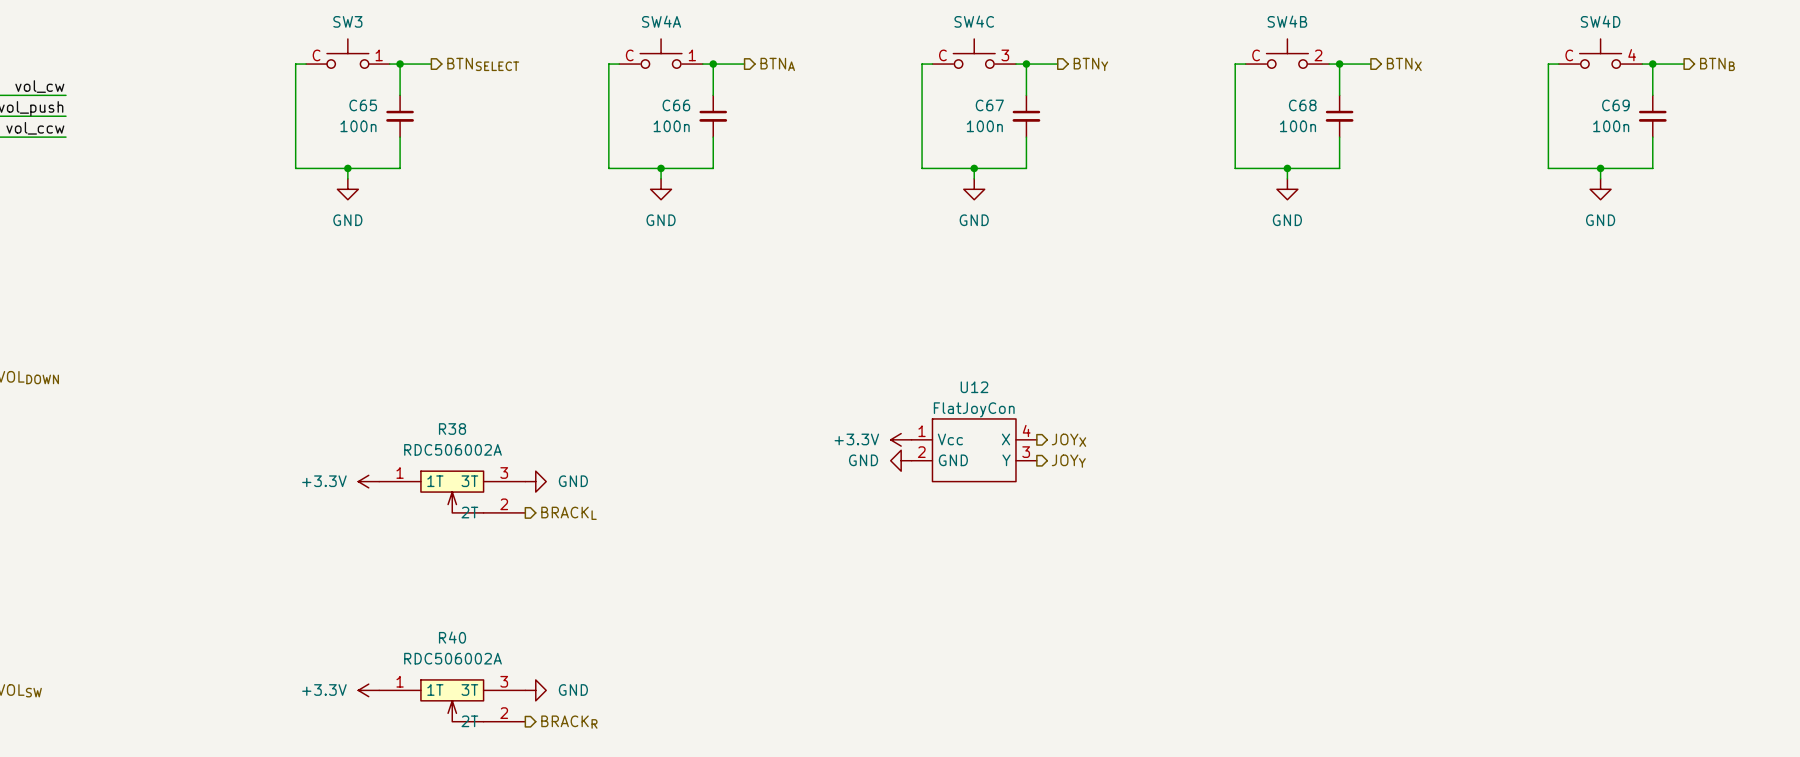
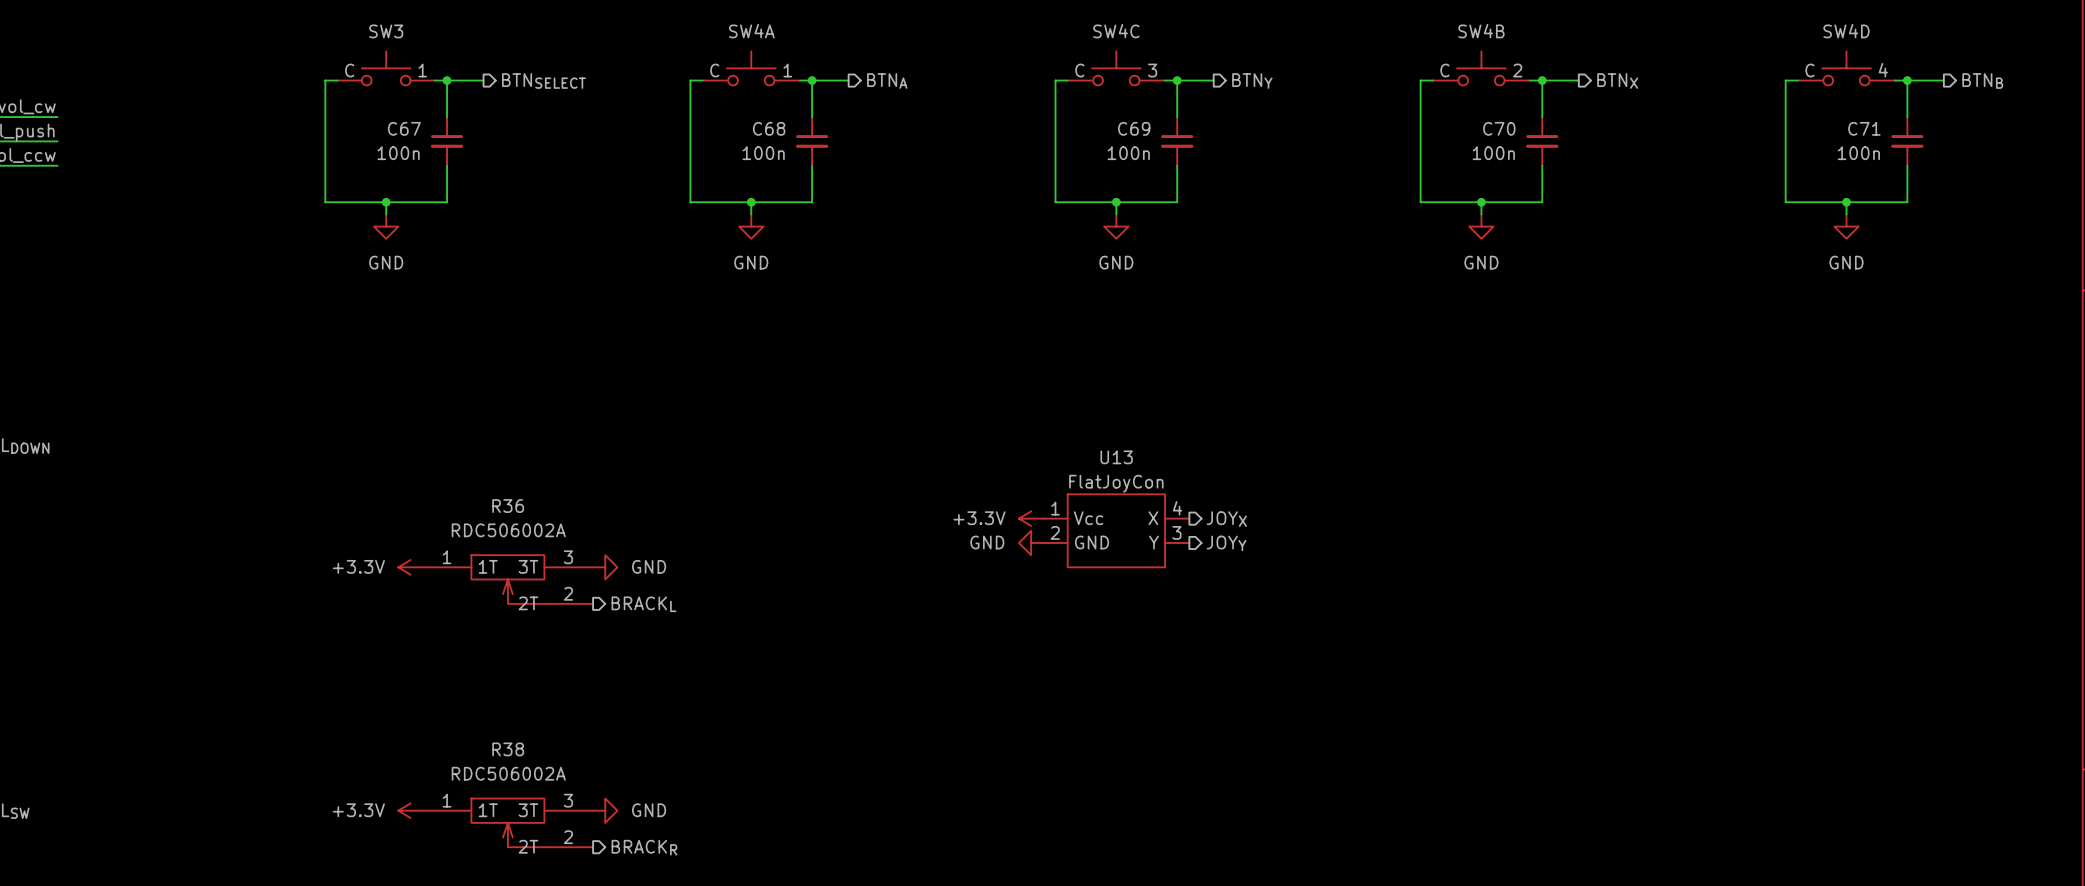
C65 name: C65 (363, 105) -> C67 (404, 128)
C66 name: C66 (676, 105) -> C68 (769, 128)
C67 name: C67 (989, 105) -> C69 (1134, 128)
C68 name: C68 (1302, 105) -> C70 (1499, 128)
C69 name: C69 (1615, 105) -> C71 (1864, 128)
U12 name: U12 (974, 387) -> U13 (1116, 457)
R38 name: R38 (452, 429) -> R36 (508, 506)
R40 name: R40 (452, 637) -> R38 (508, 749)

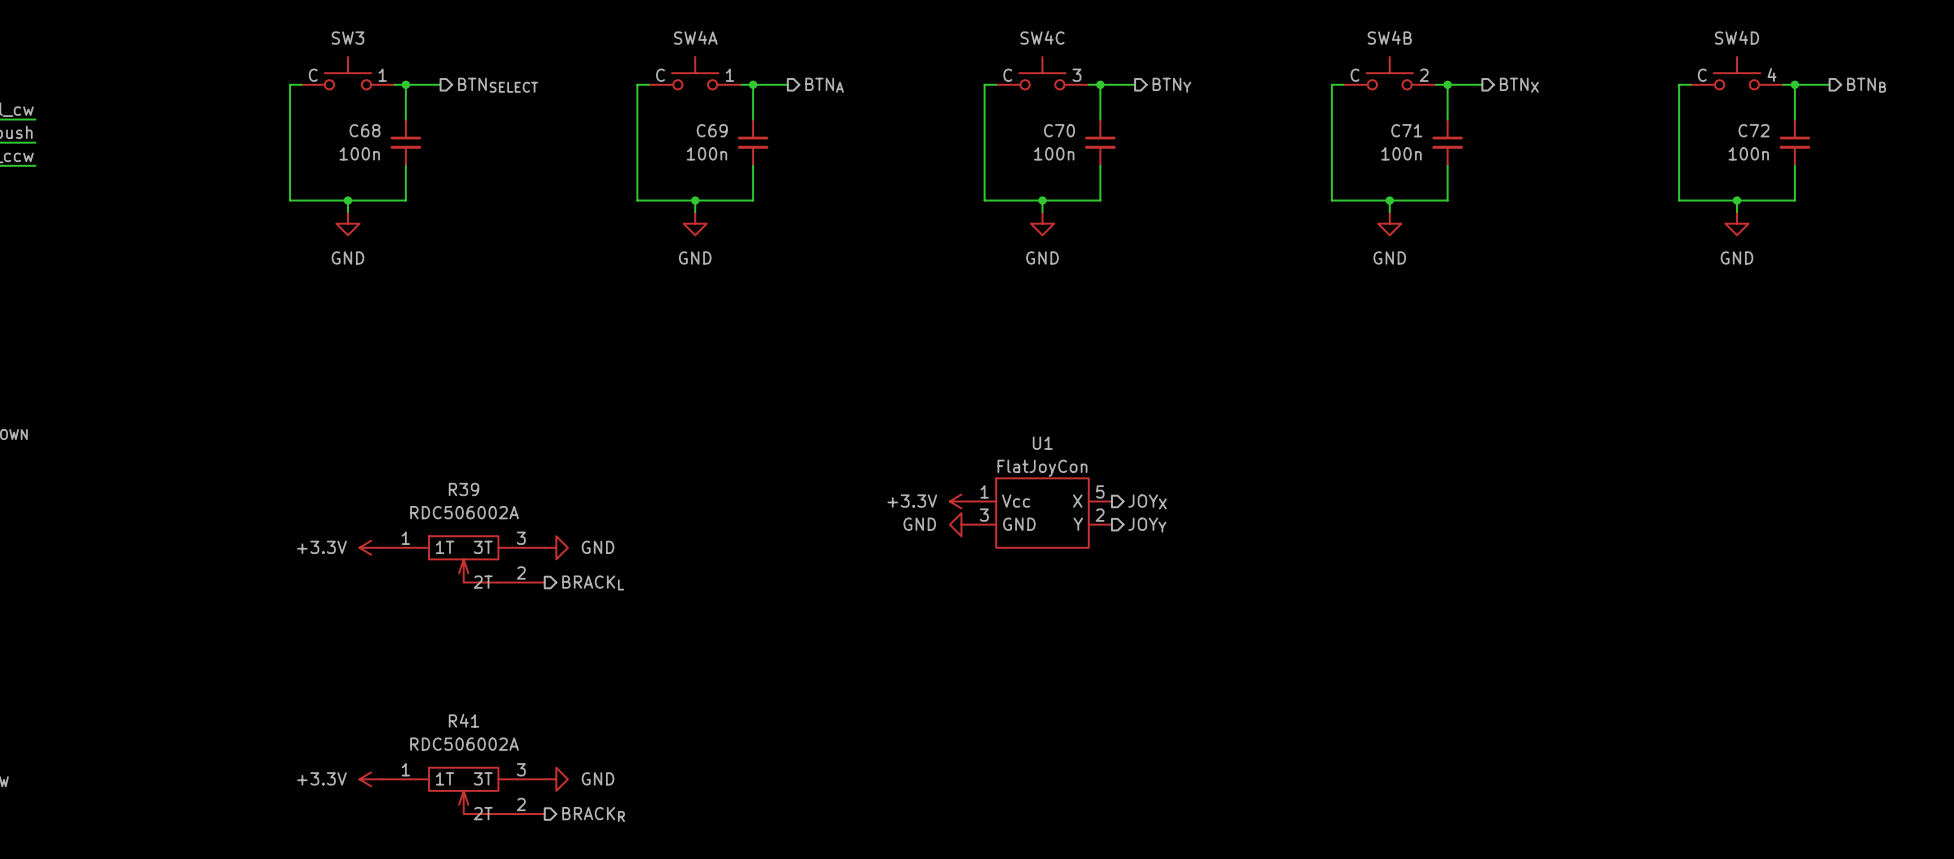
C67 name: C67 (404, 128) -> C68 (364, 130)
C68 name: C68 (769, 128) -> C69 (712, 130)
C69 name: C69 (1134, 128) -> C70 (1059, 130)
C70 name: C70 (1499, 128) -> C71 (1406, 130)
C71 name: C71 (1864, 128) -> C72 (1754, 130)
U13 name: U13 (1116, 457) -> U1 (1042, 443)
R36 name: R36 (508, 506) -> R39 (464, 489)
U13 pin number: 4 (1177, 508) -> 5 (1100, 491)
U13 pin number: 2 (1055, 532) -> 3 (984, 515)
U13 pin number: 3 (1176, 532) -> 2 (1100, 515)
R38 name: R38 (508, 749) -> R41 (464, 720)

